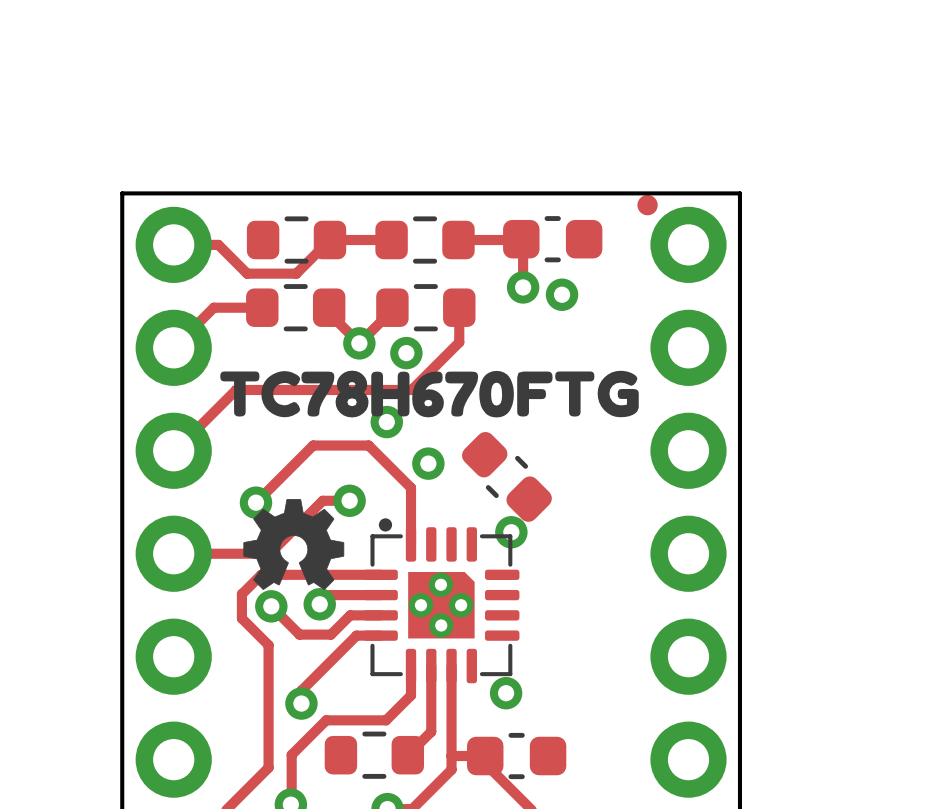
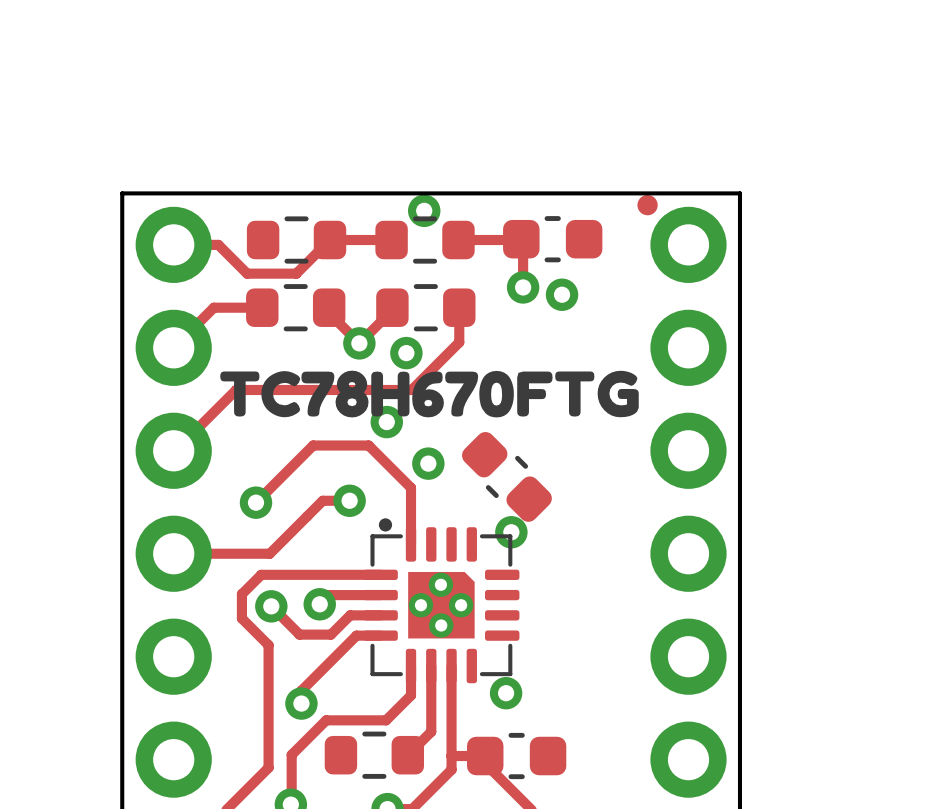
via: none -> (424, 210)
drawing: [243, 499, 345, 590] -> none

